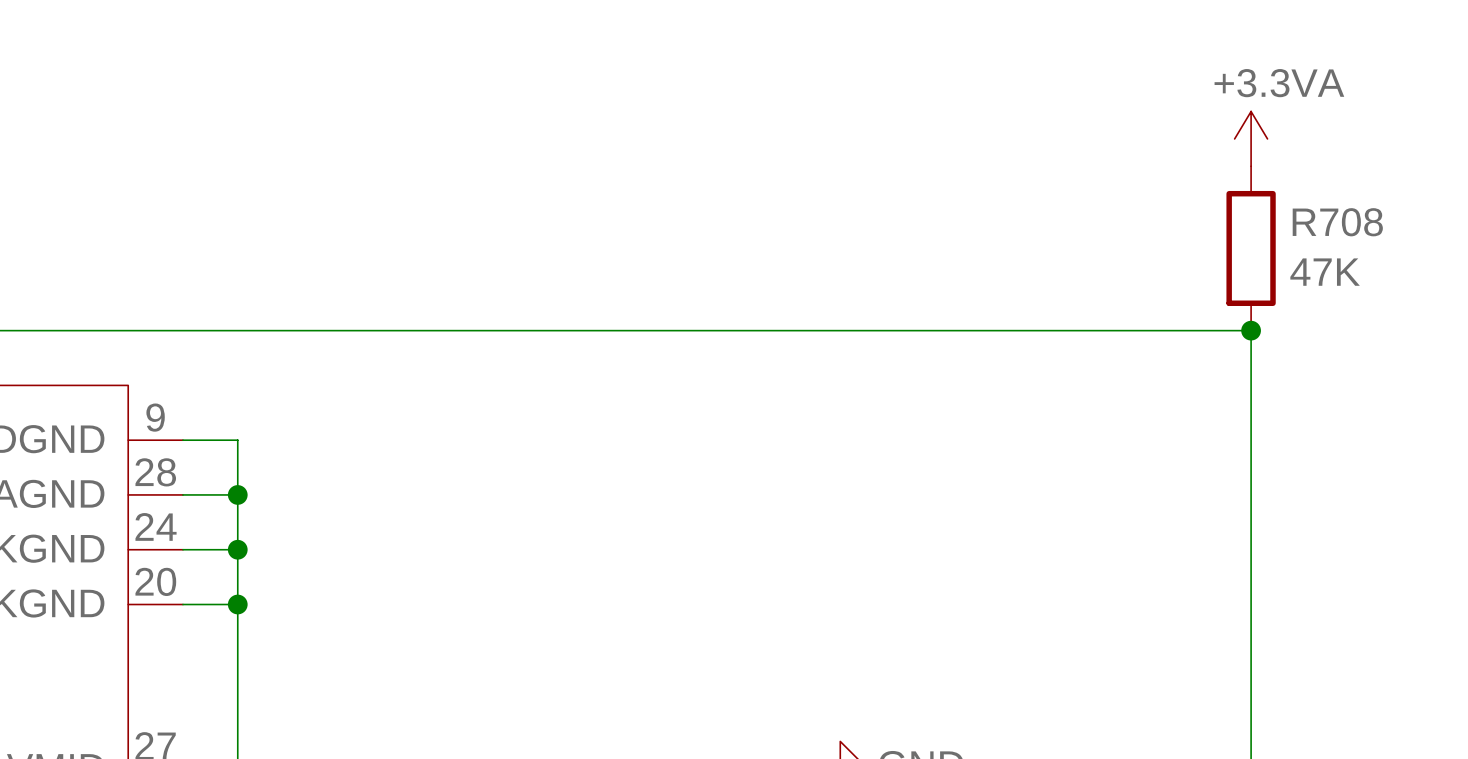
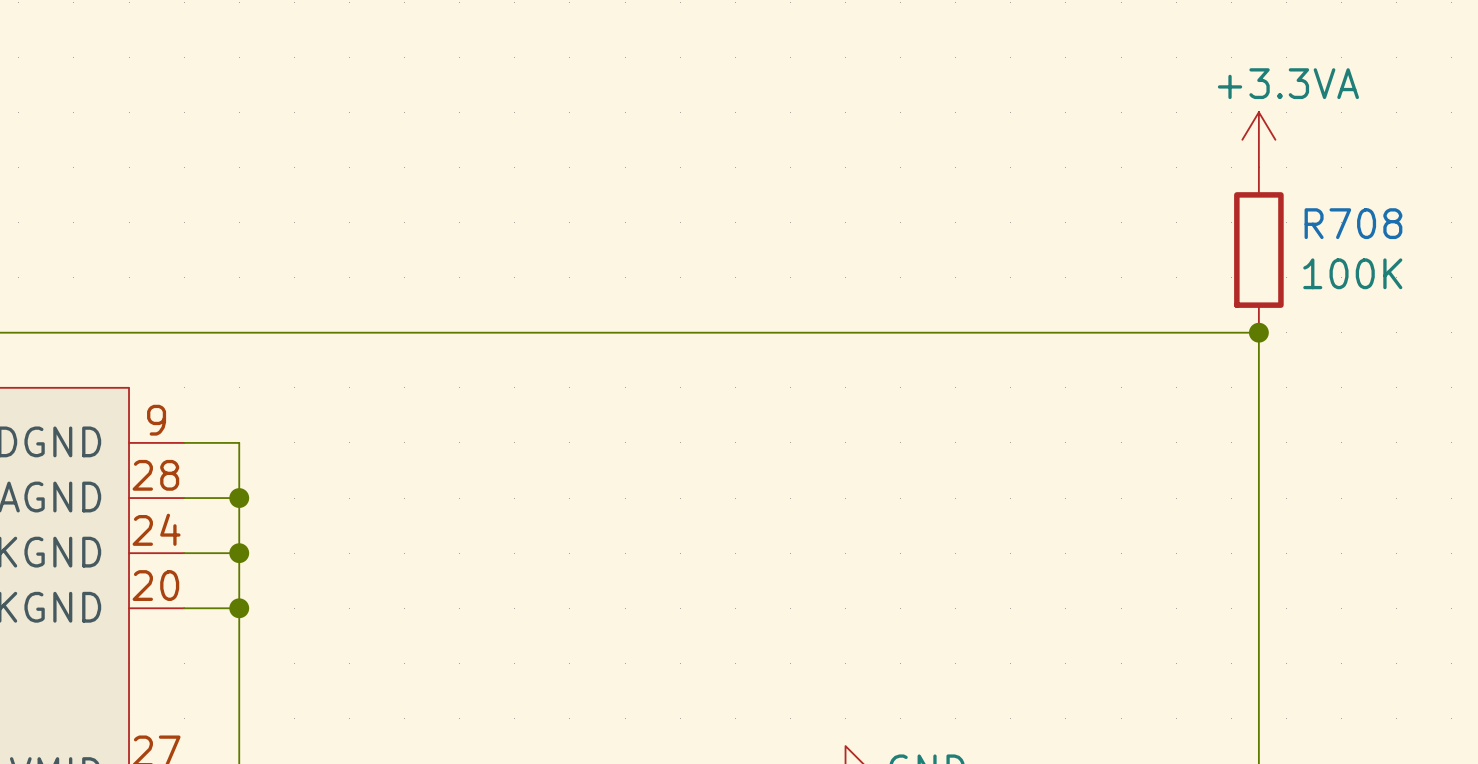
R708 value: 47K (1325, 272) -> 100K (1352, 273)

